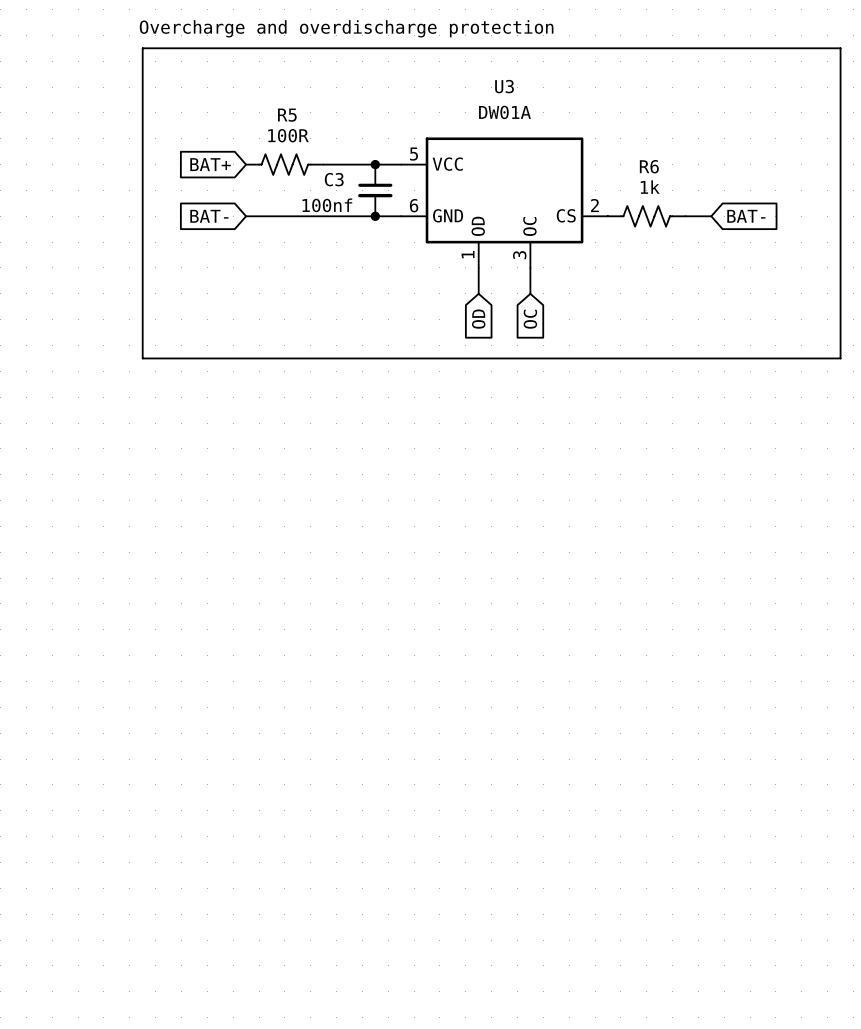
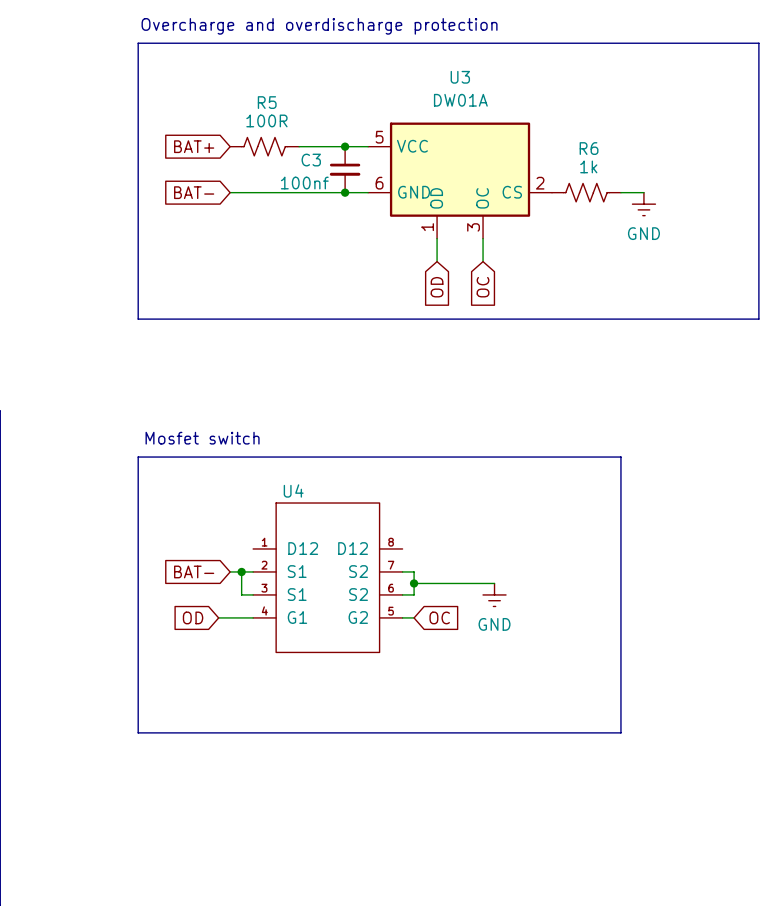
global label: BAT- (746, 216) -> none
power symbol: none -> GND (643, 204)
text: none -> Mosfet switch (202, 438)
line: none -> (138, 457) (138, 732) (620, 732) (620, 457) (138, 457)
global label: none -> BAT- (194, 571)
wire: none -> (230, 571) (253, 571)
wire: none -> (241, 571) (241, 594) (253, 594)
junction: none -> (241, 571)
wire: none -> (402, 571) (414, 571) (414, 594) (402, 594)
U4: none -> (327, 577)
wire: none -> (414, 583) (494, 583)
junction: none -> (414, 583)
power symbol: none -> GND (494, 594)
global label: none -> OD (193, 617)
wire: none -> (218, 617) (253, 617)
wire: none -> (402, 617) (414, 617)
global label: none -> OC (439, 617)

